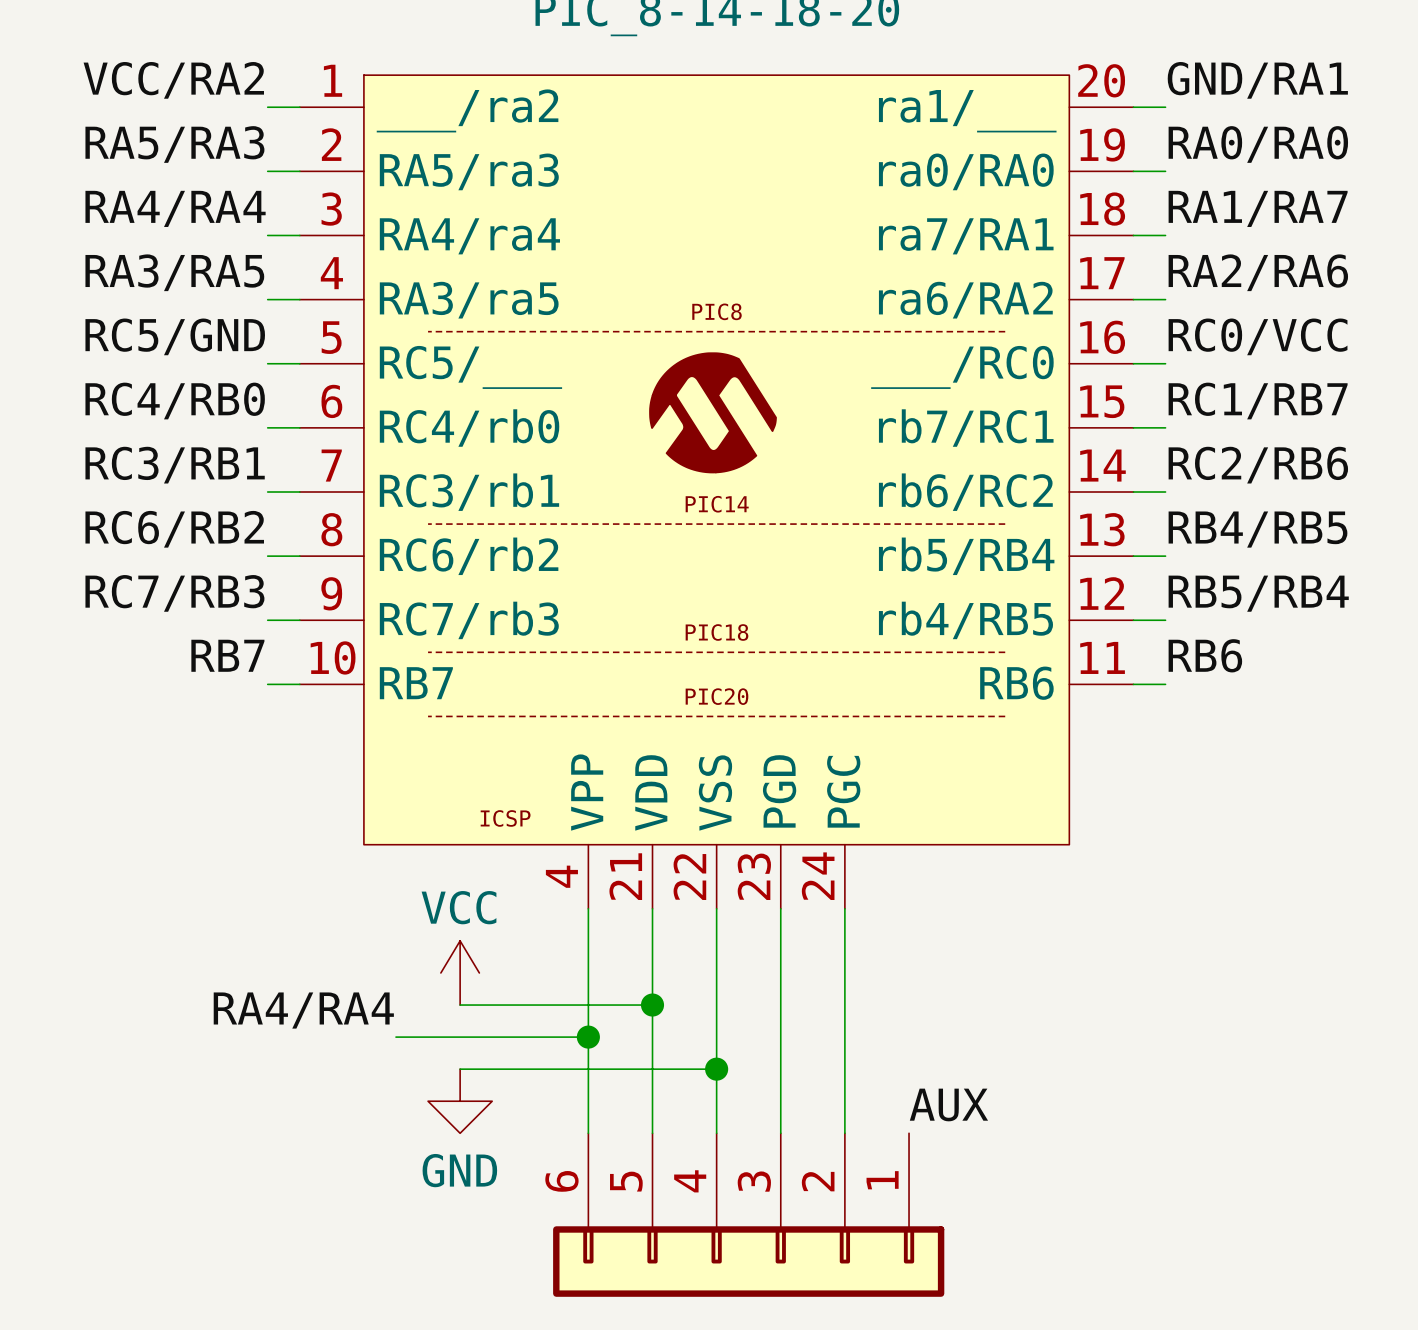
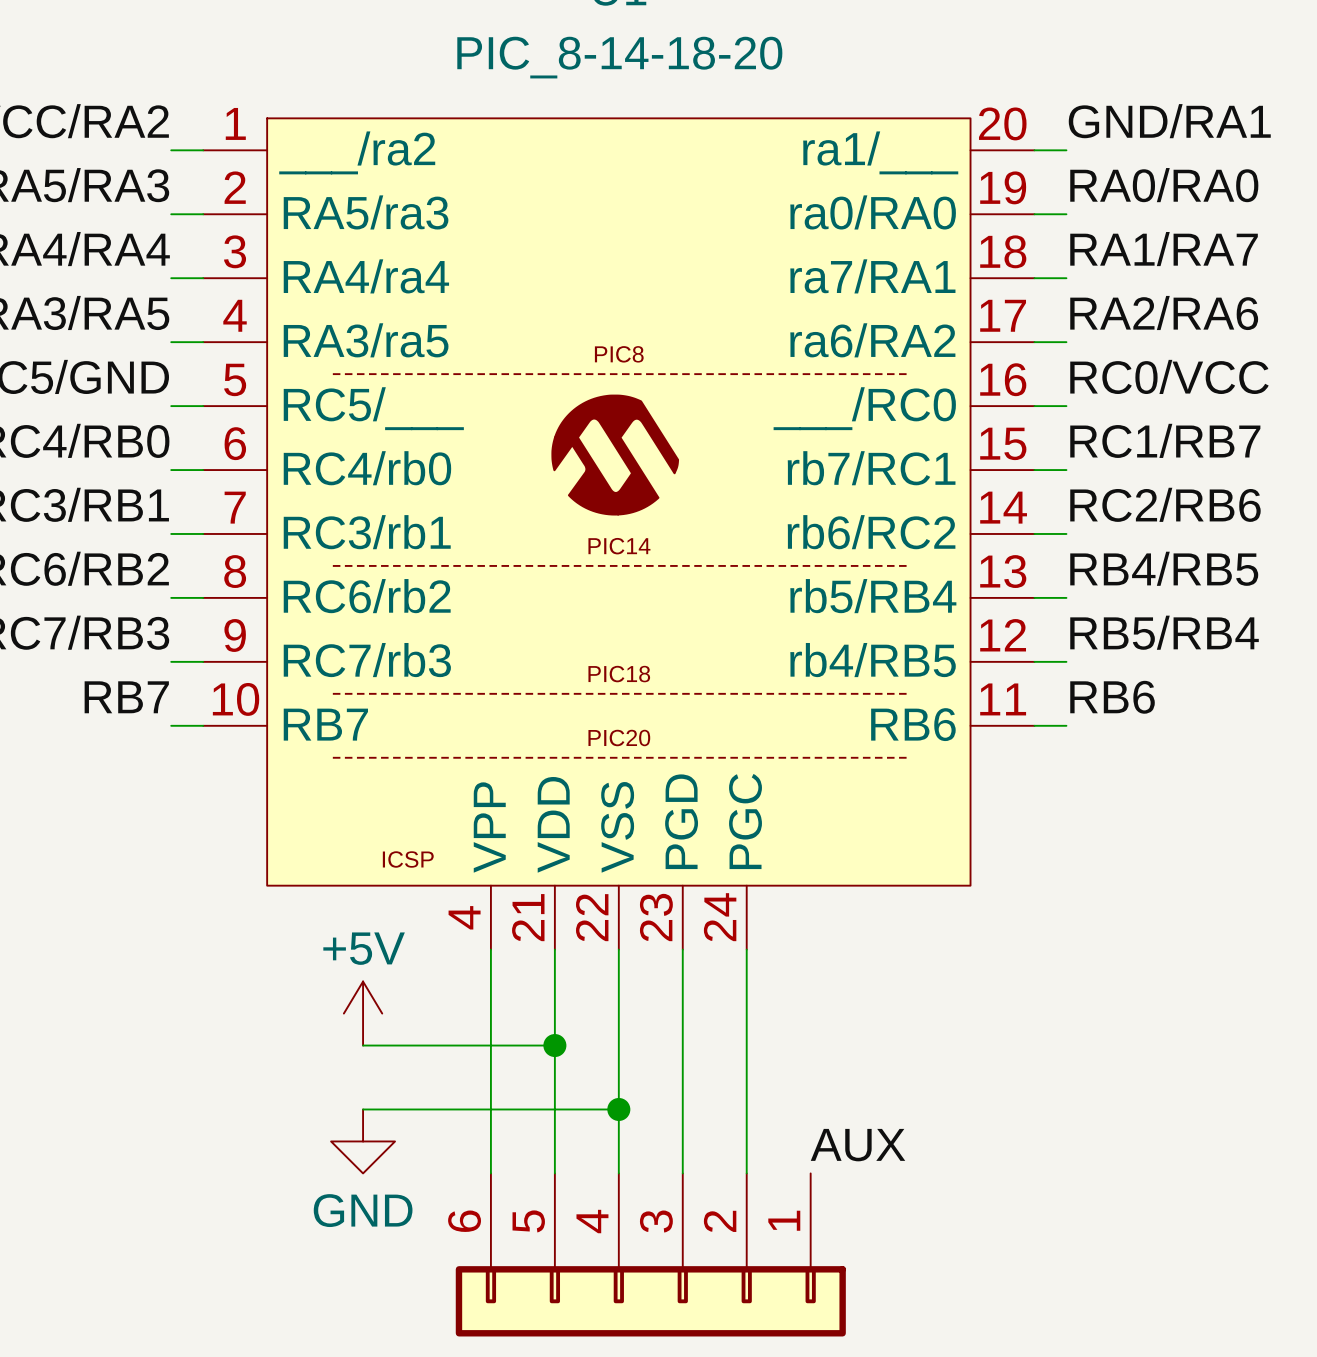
power symbol: VCC (460, 972) -> +5V (363, 1013)
label: RA4/RA4 (303, 1010) -> none
wire: (395, 1037) (588, 1037) -> none
junction: (588, 1037) -> none

